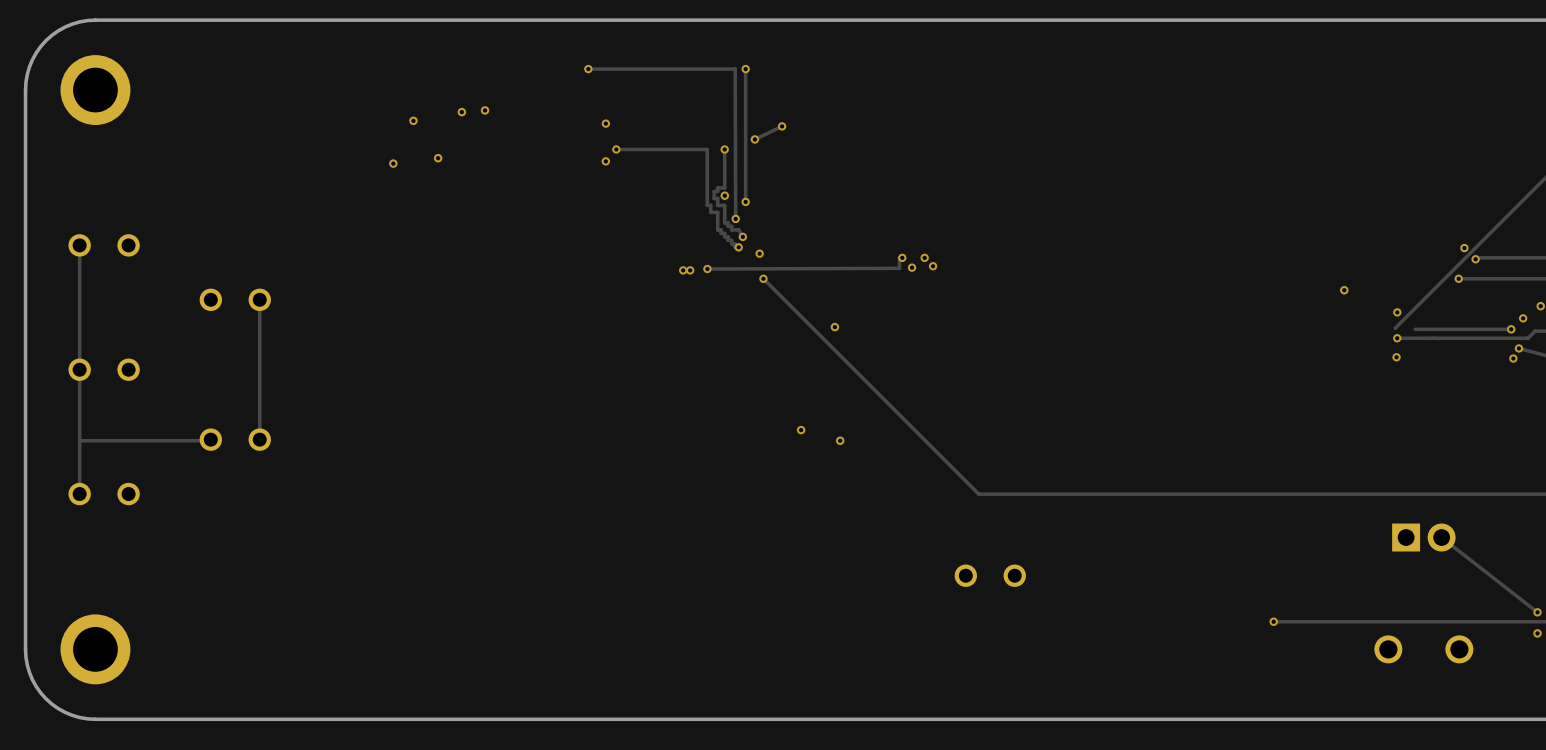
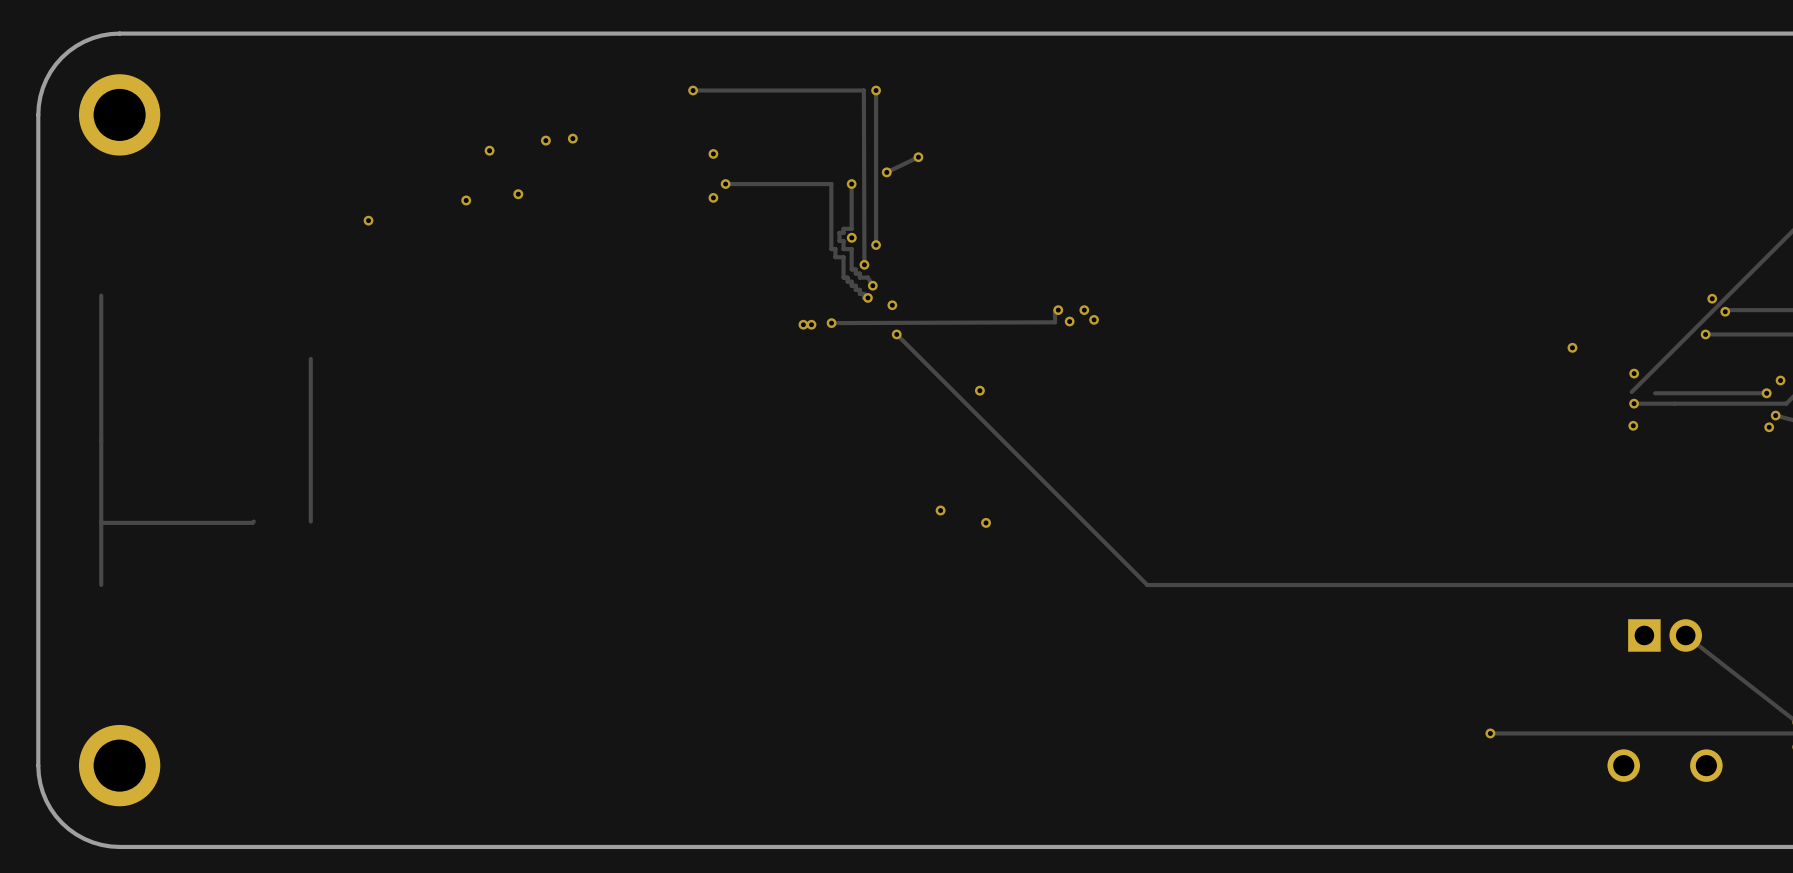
via: none -> (368, 220)
part: (104, 245) -> none
part: (235, 299) -> none
part: (104, 369) -> none
part: (235, 439) -> none
part: (104, 494) -> none
part: (990, 575) -> none

